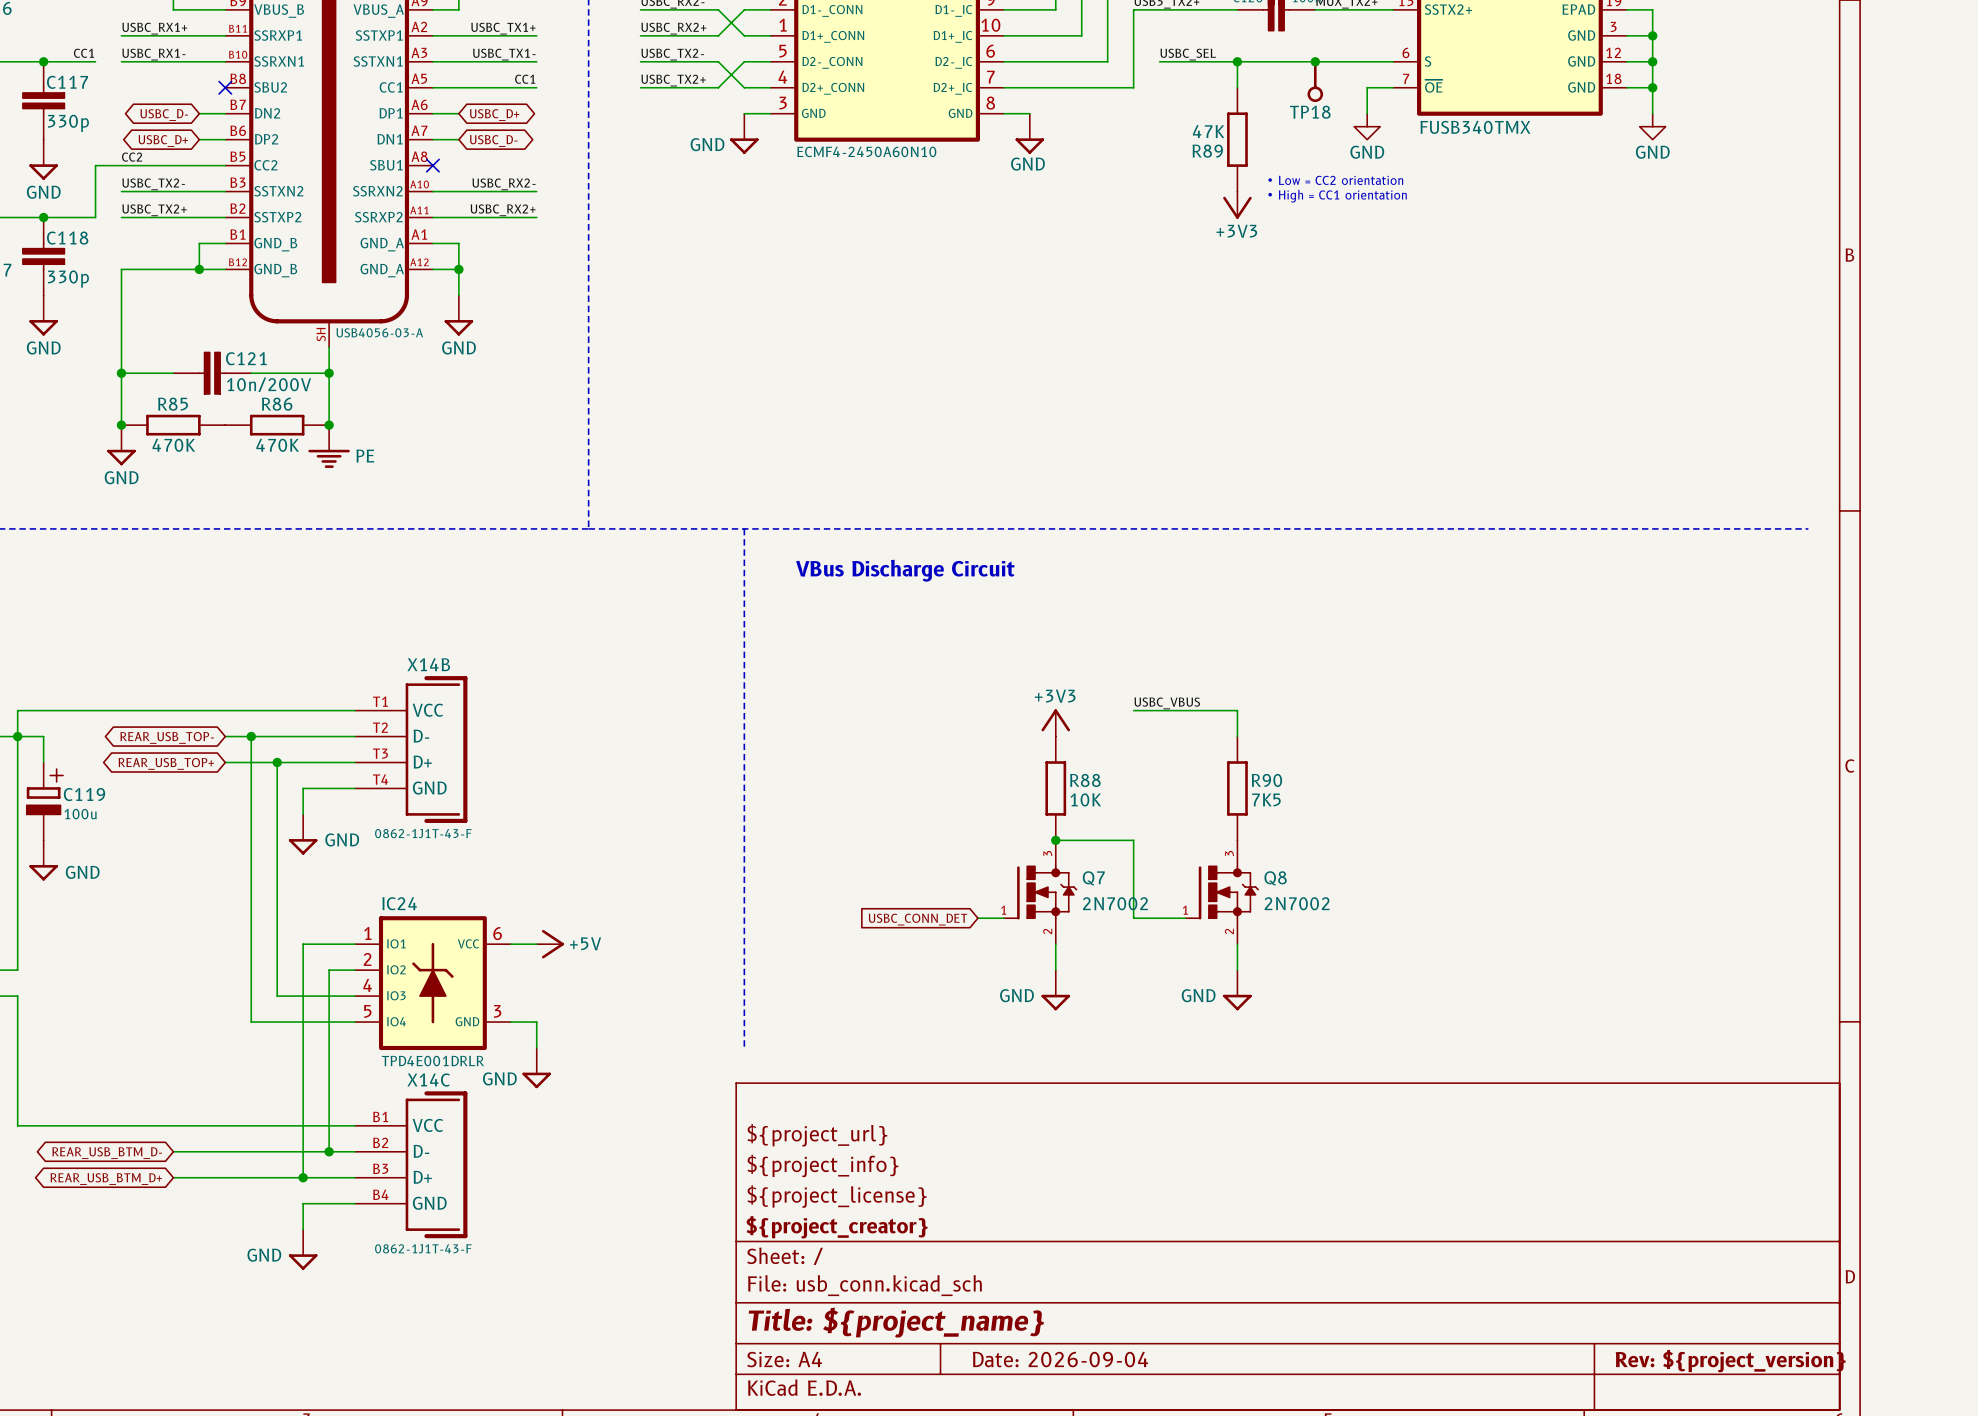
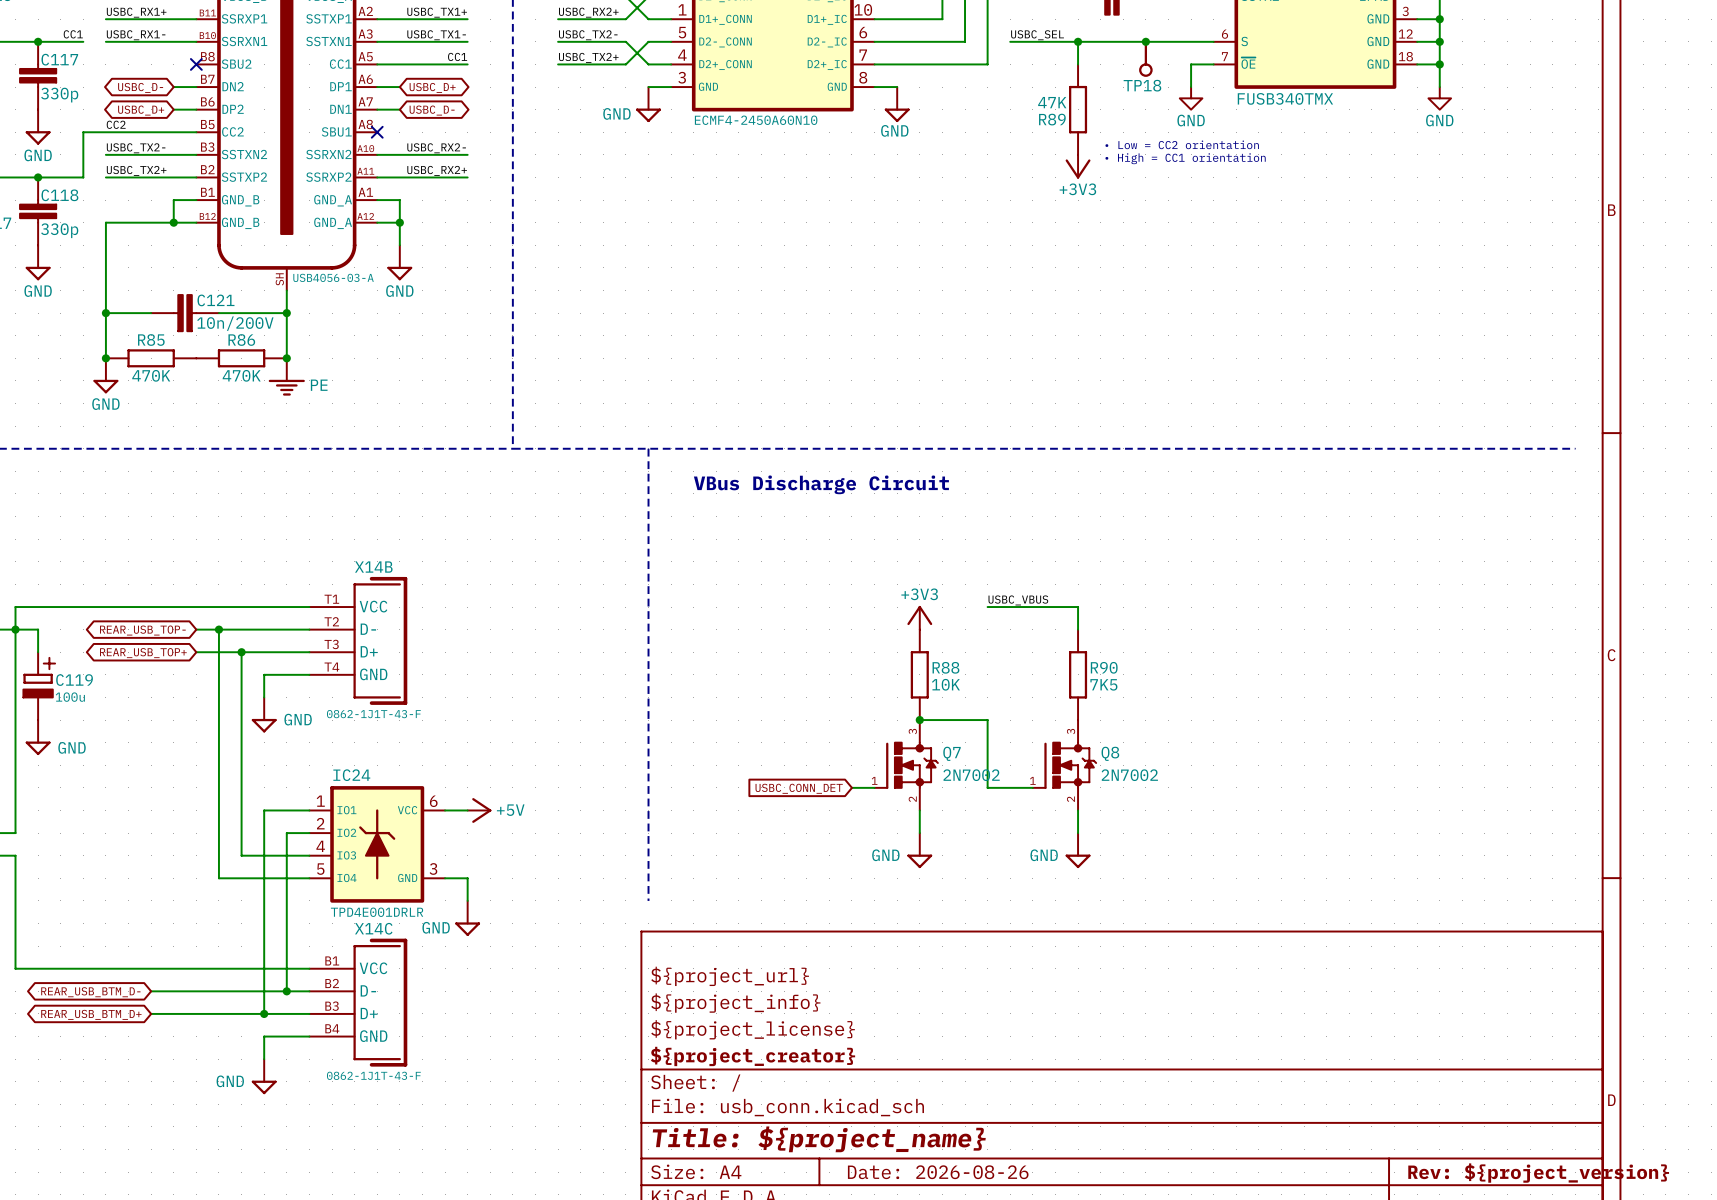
title block: Date: 2026-09-04 (1060, 1359) -> Date: 2026-08-26 (938, 1172)

